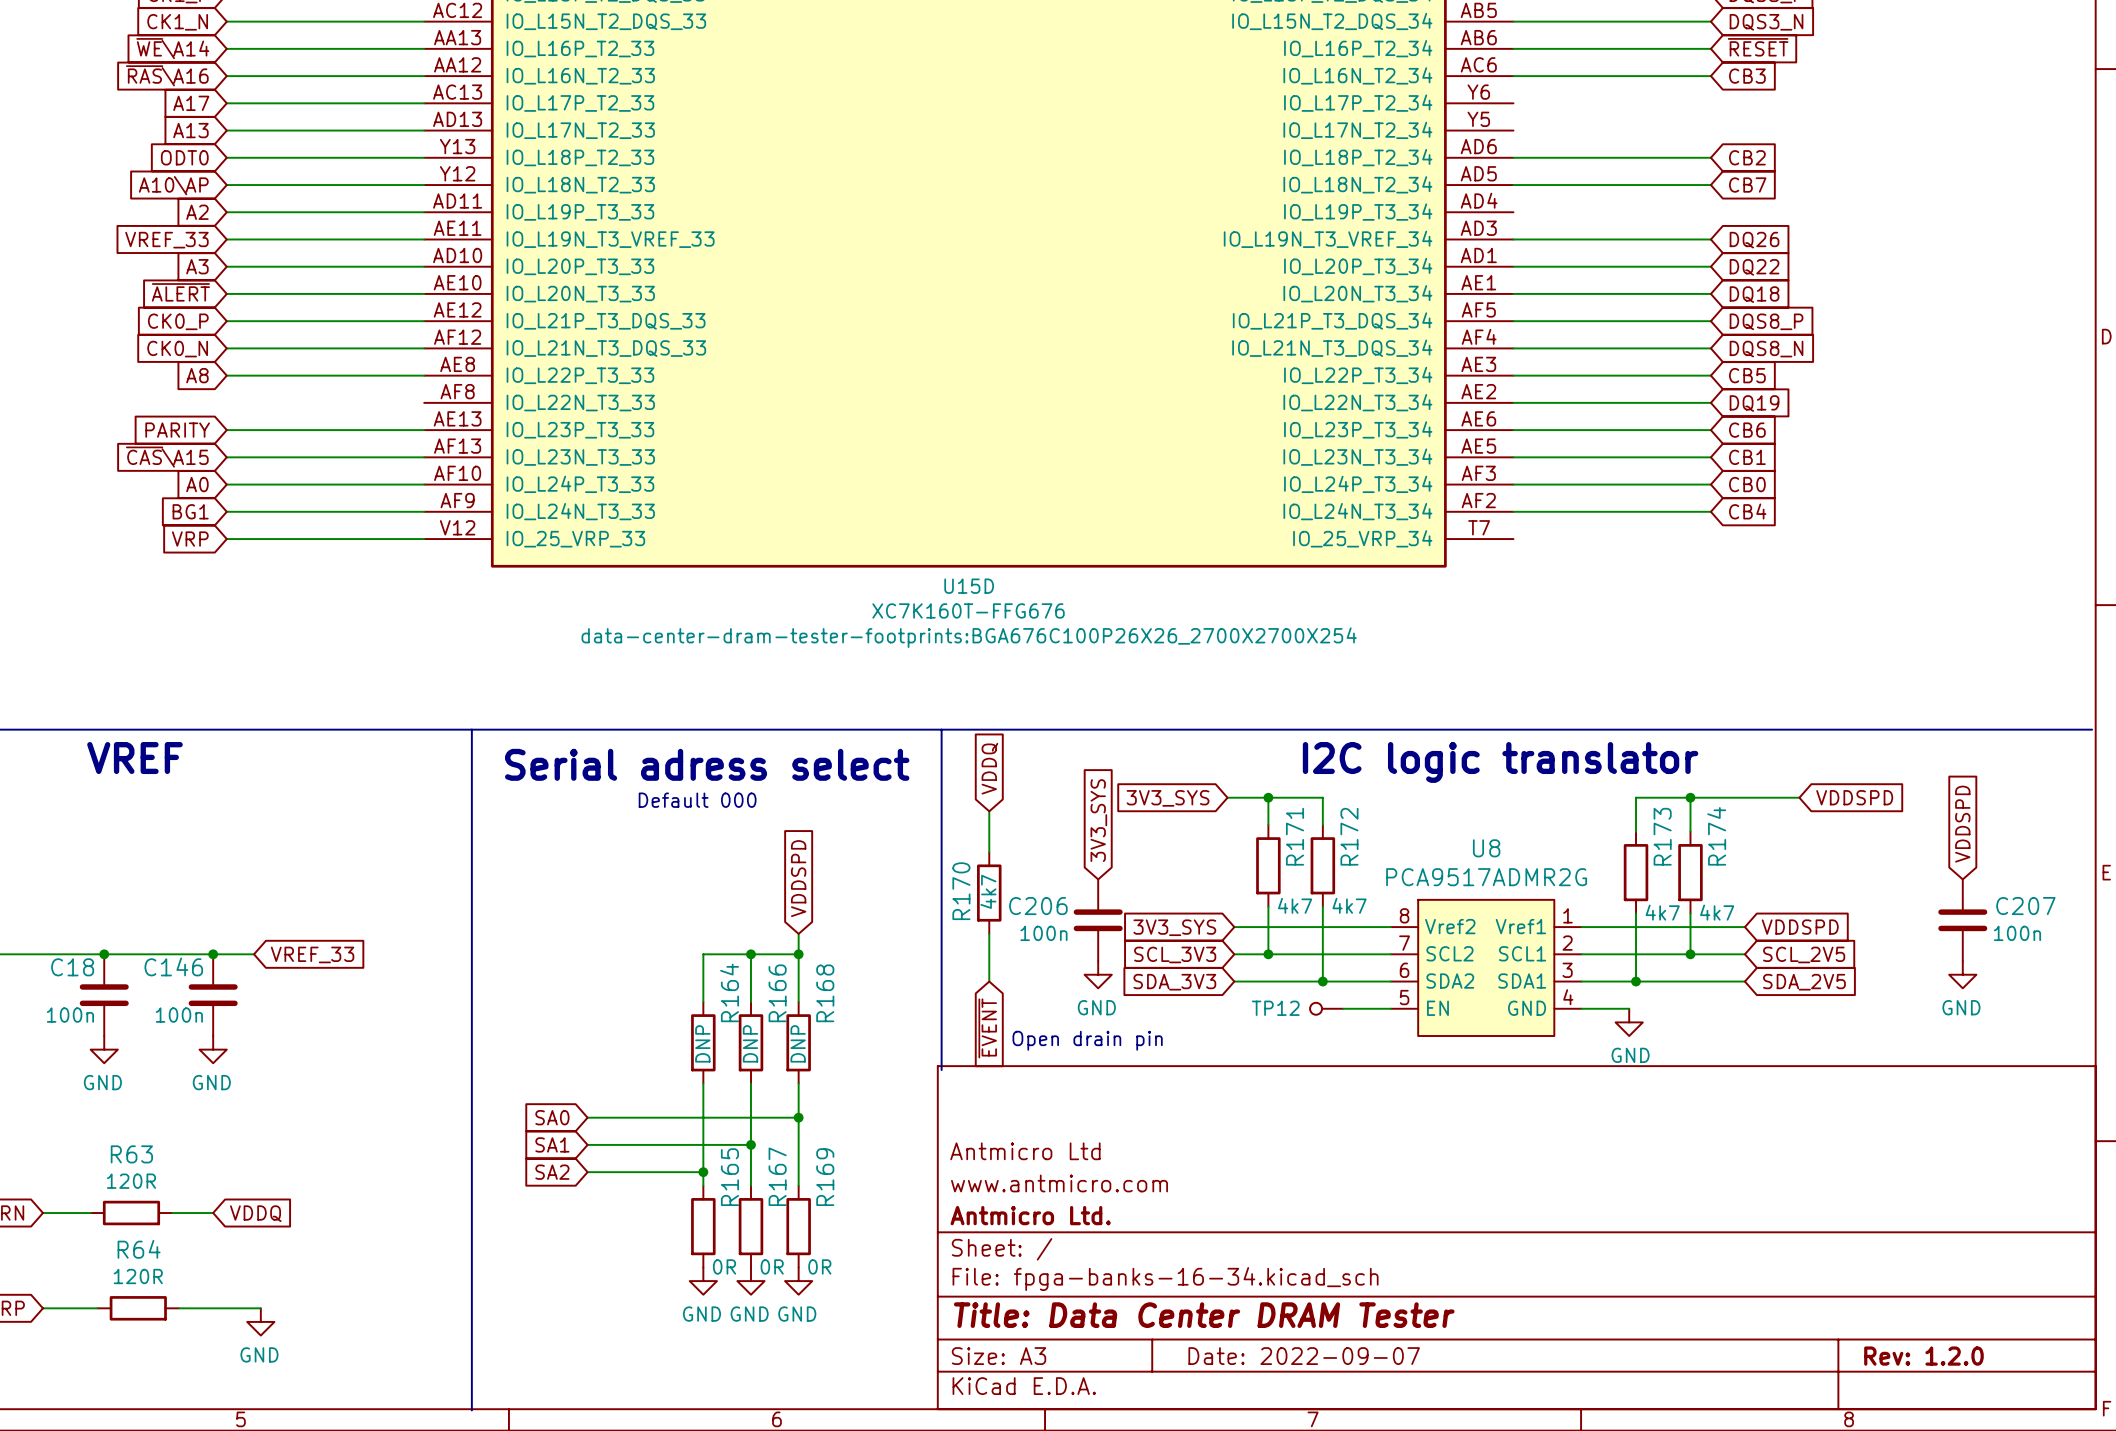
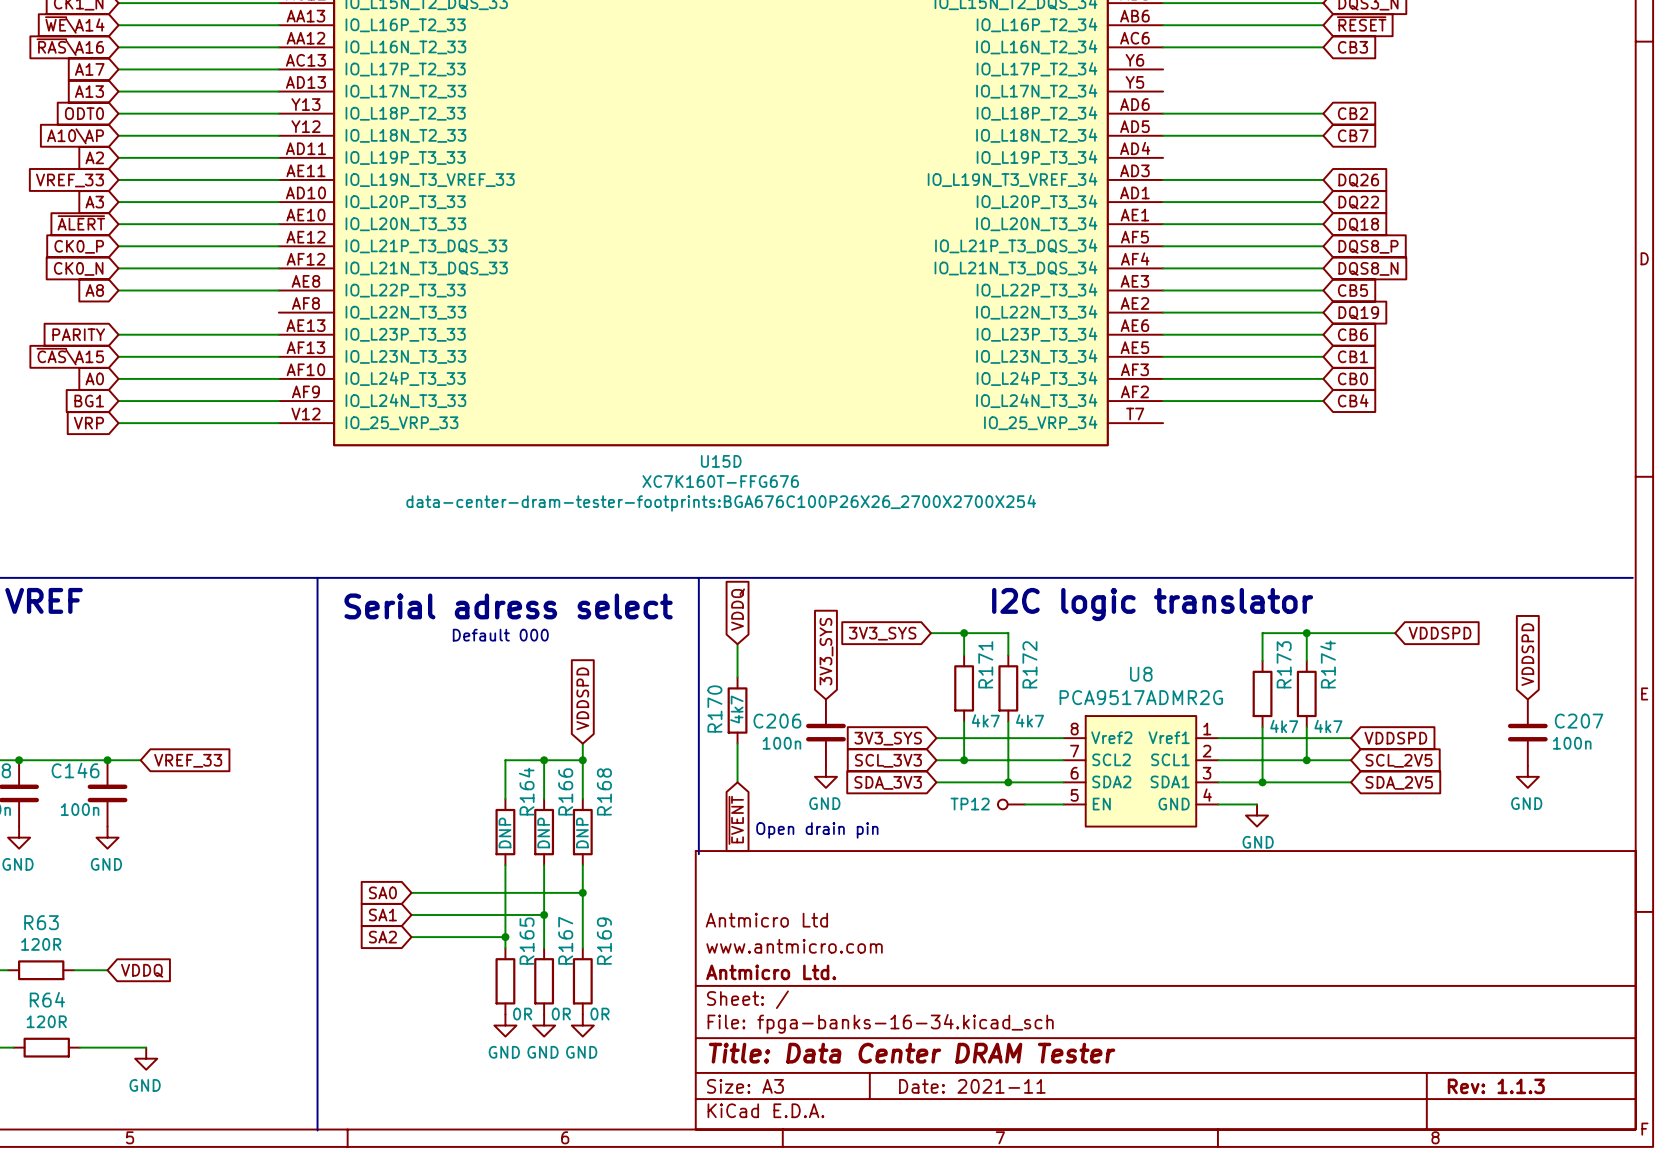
title block: Date: 2022-09-07 (1304, 1356) -> Date: 2021-11 (972, 1086)
title block: Rev: 1.2.0 (1923, 1356) -> Rev: 1.1.3 (1496, 1086)

